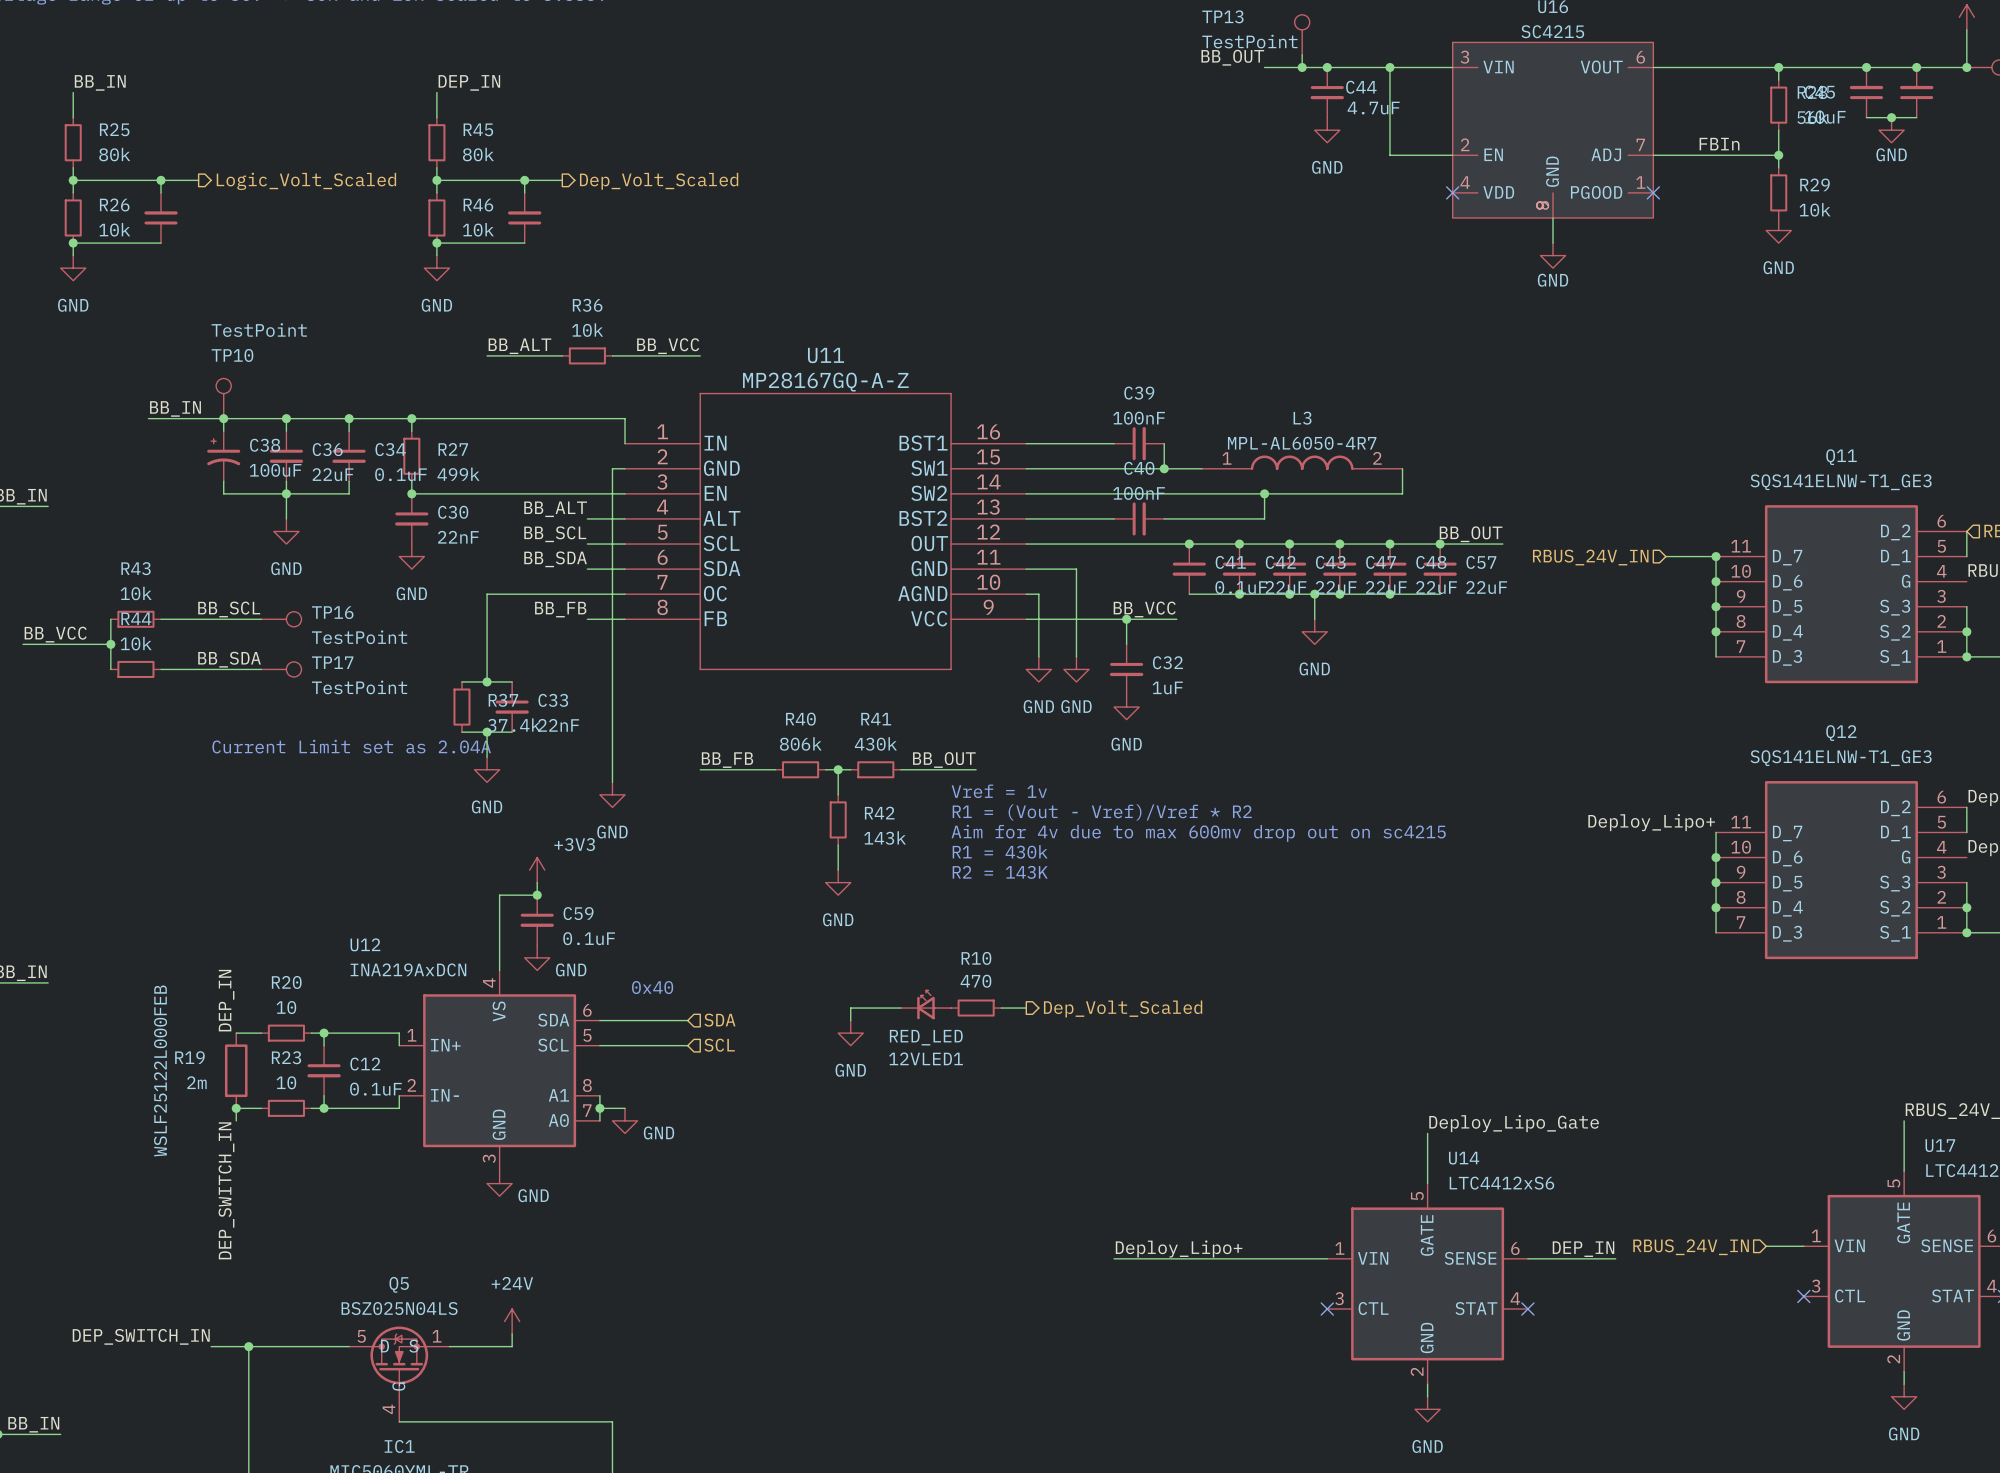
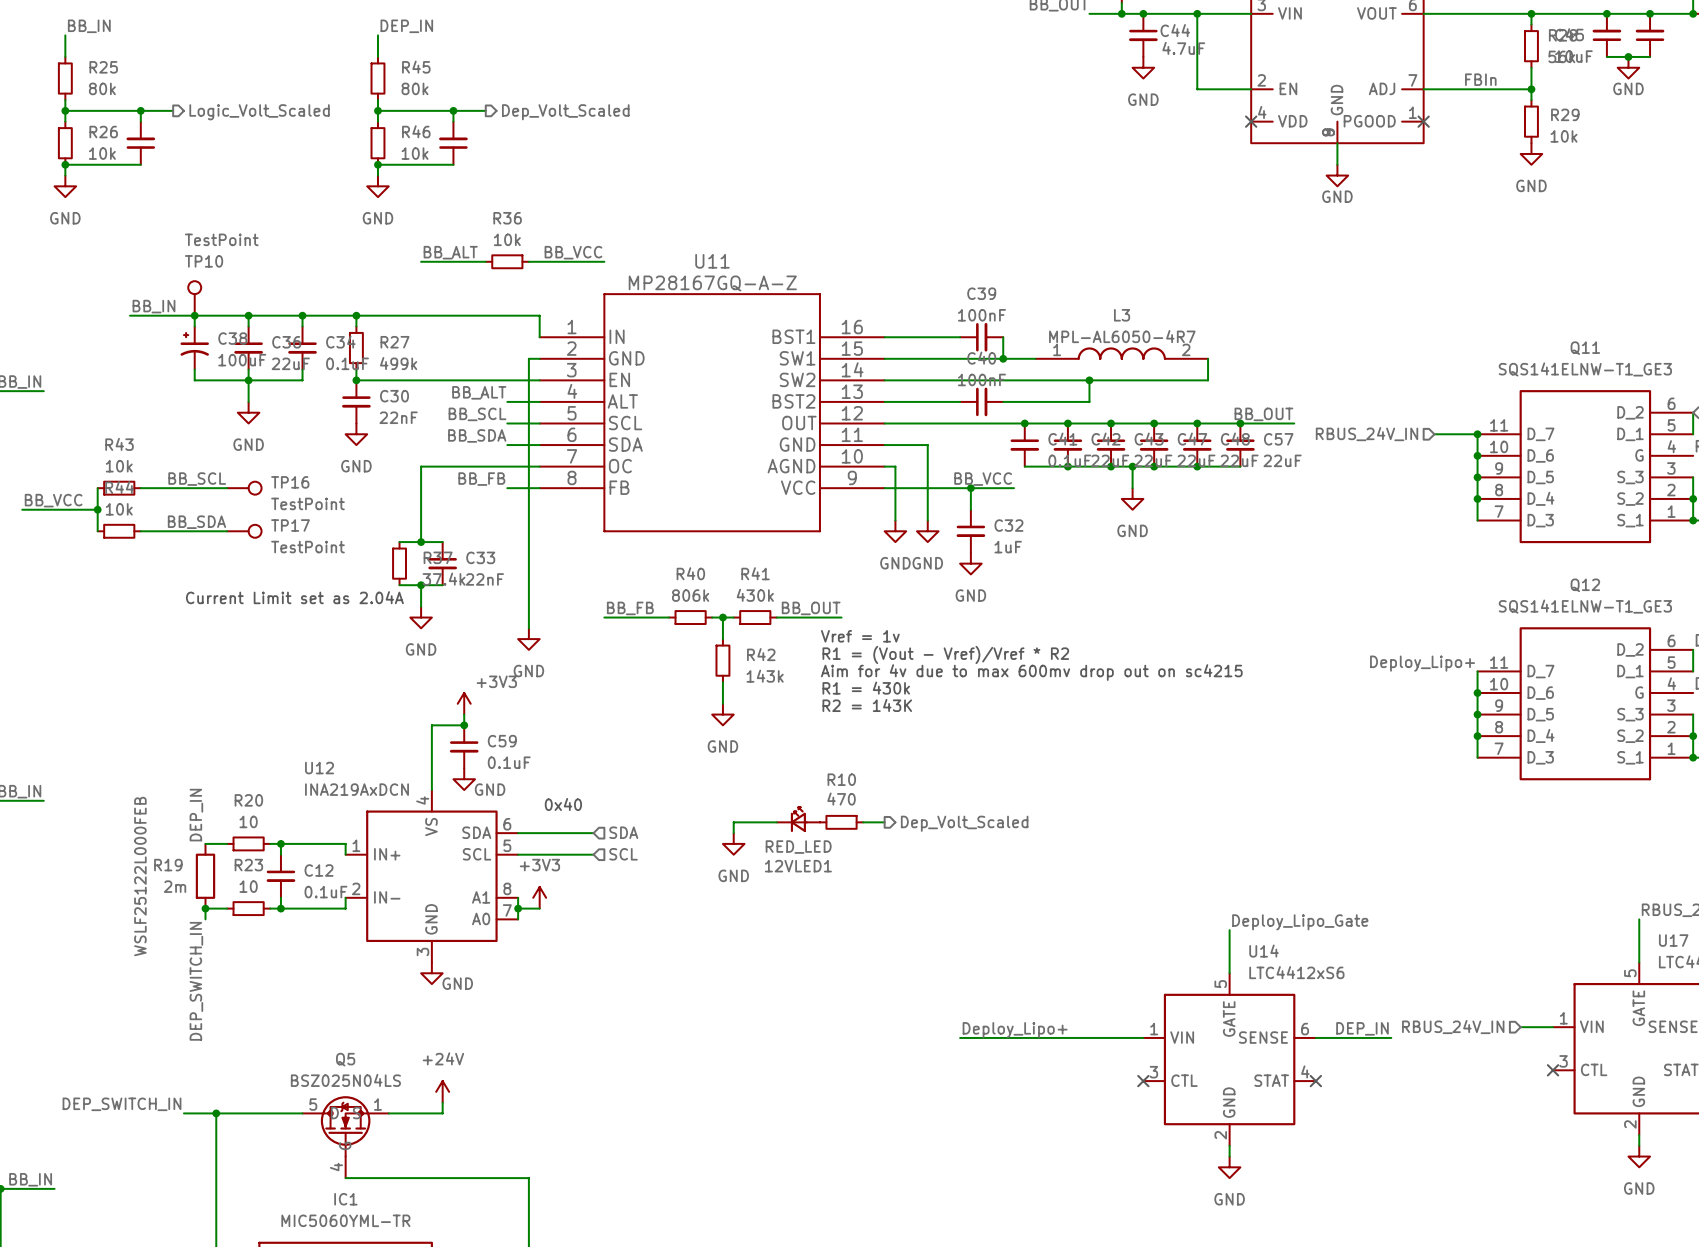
power symbol: none -> +3V3 (539, 897)
power symbol: GND (625, 1120) -> none

